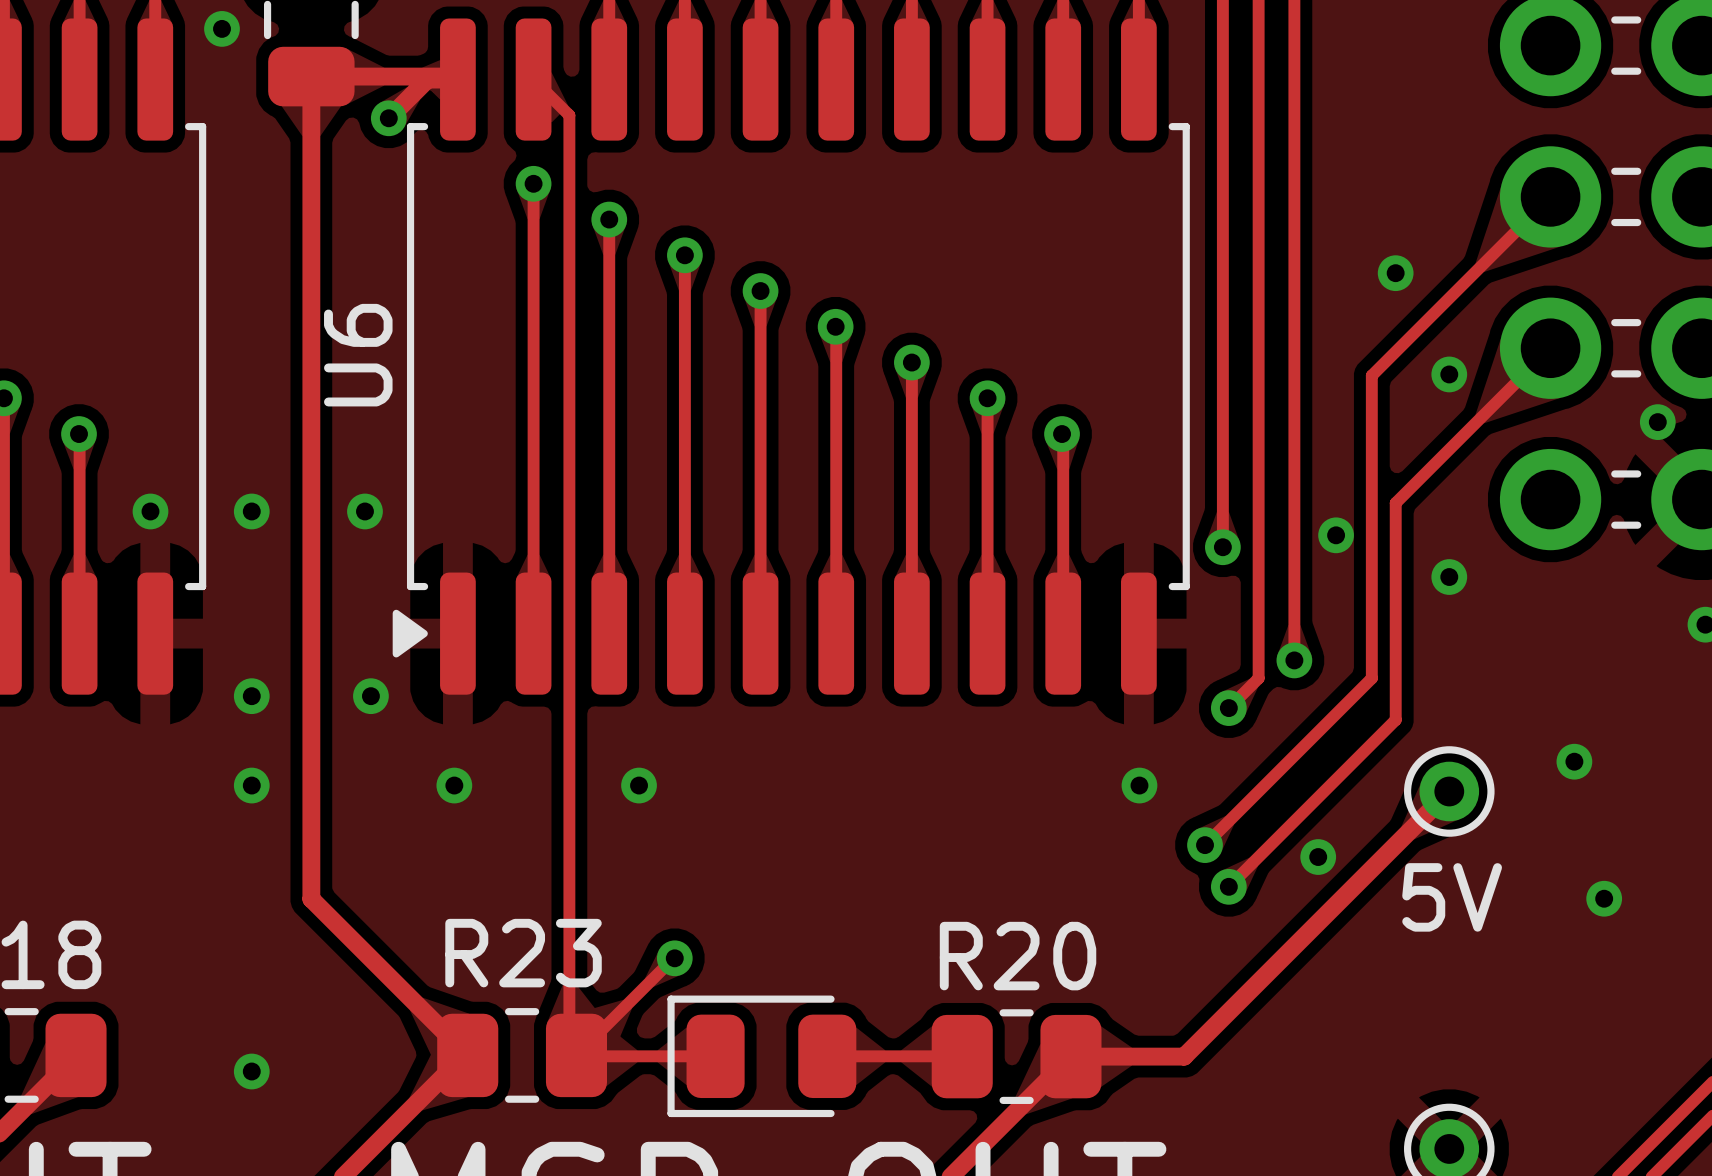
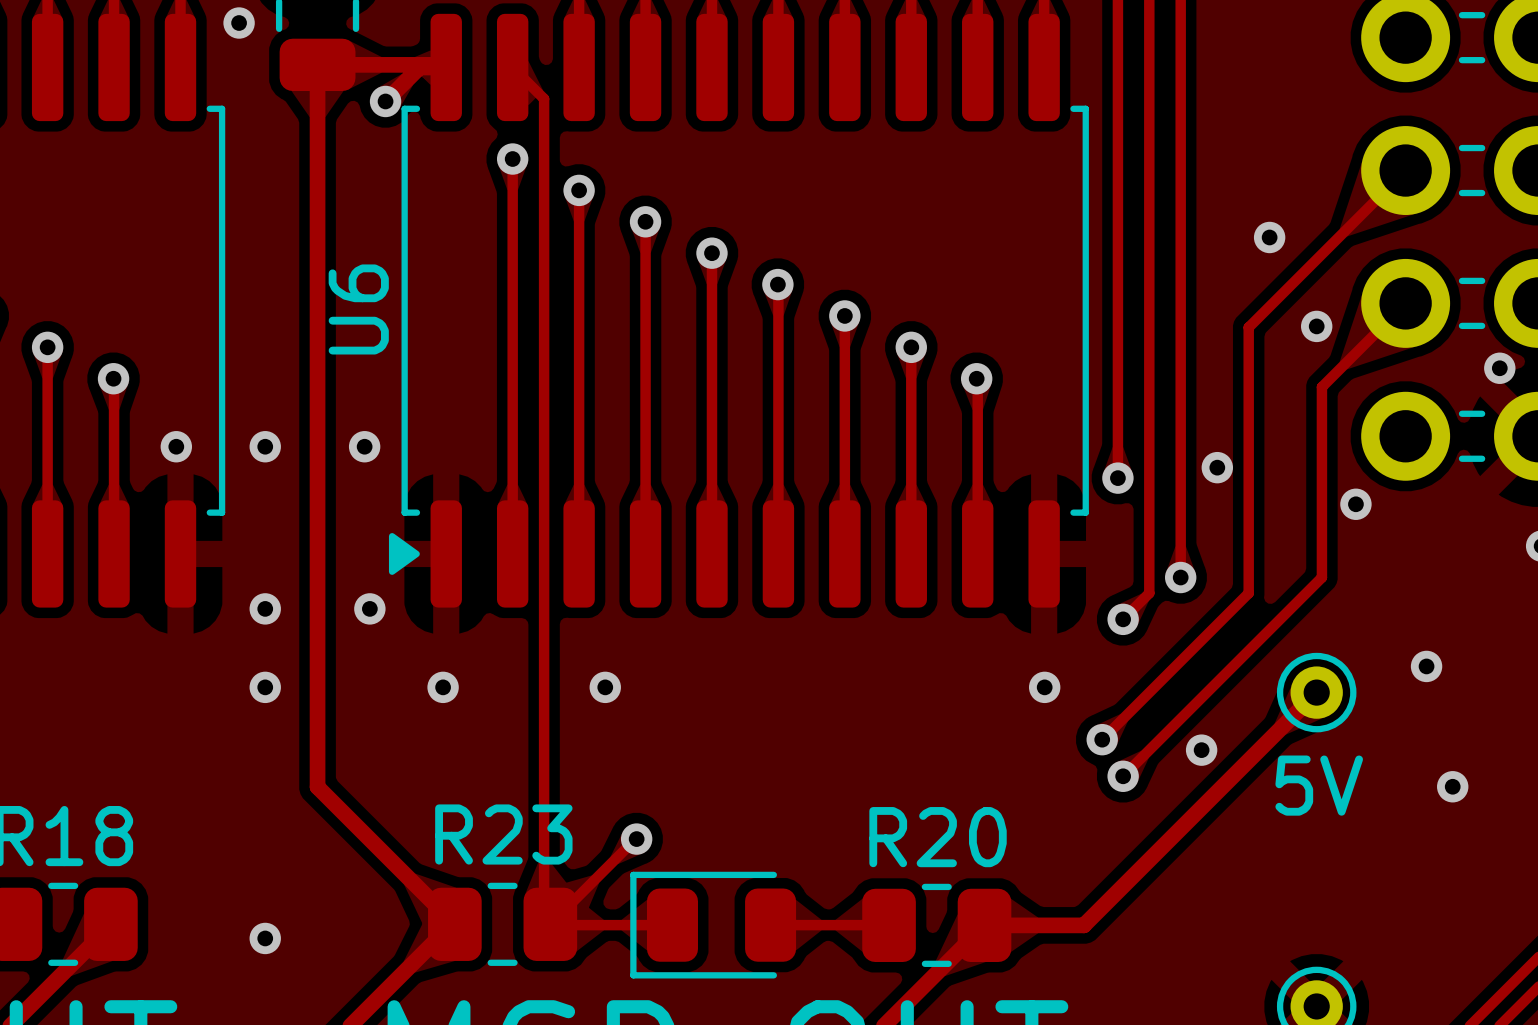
track: (1455, 443) (1395, 503) (1395, 719) -> (1321, 387) (1321, 577) (1269, 629)
via position: (1449, 577) -> (1355, 504)

